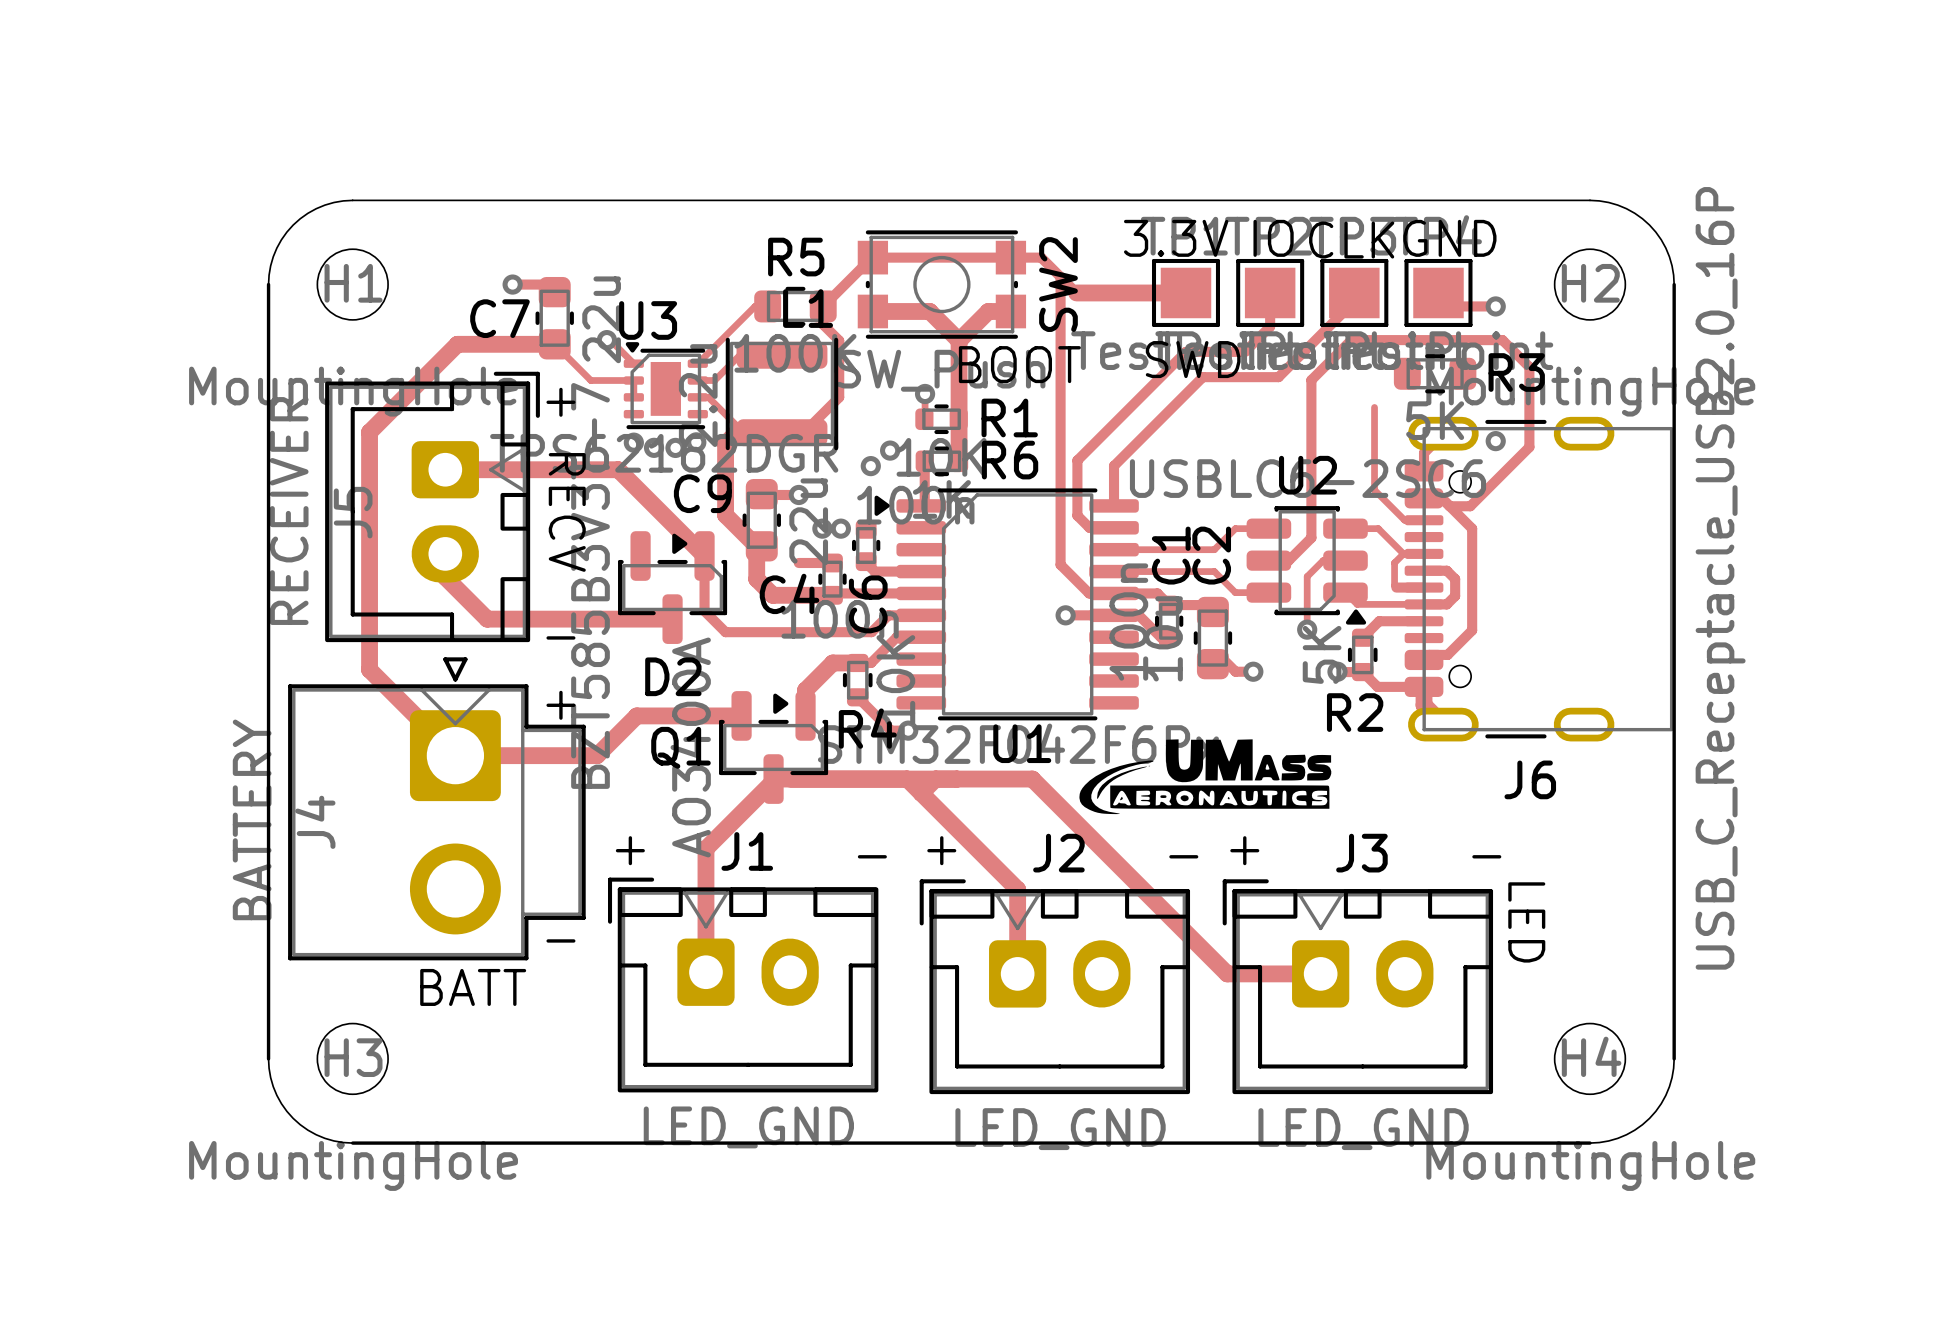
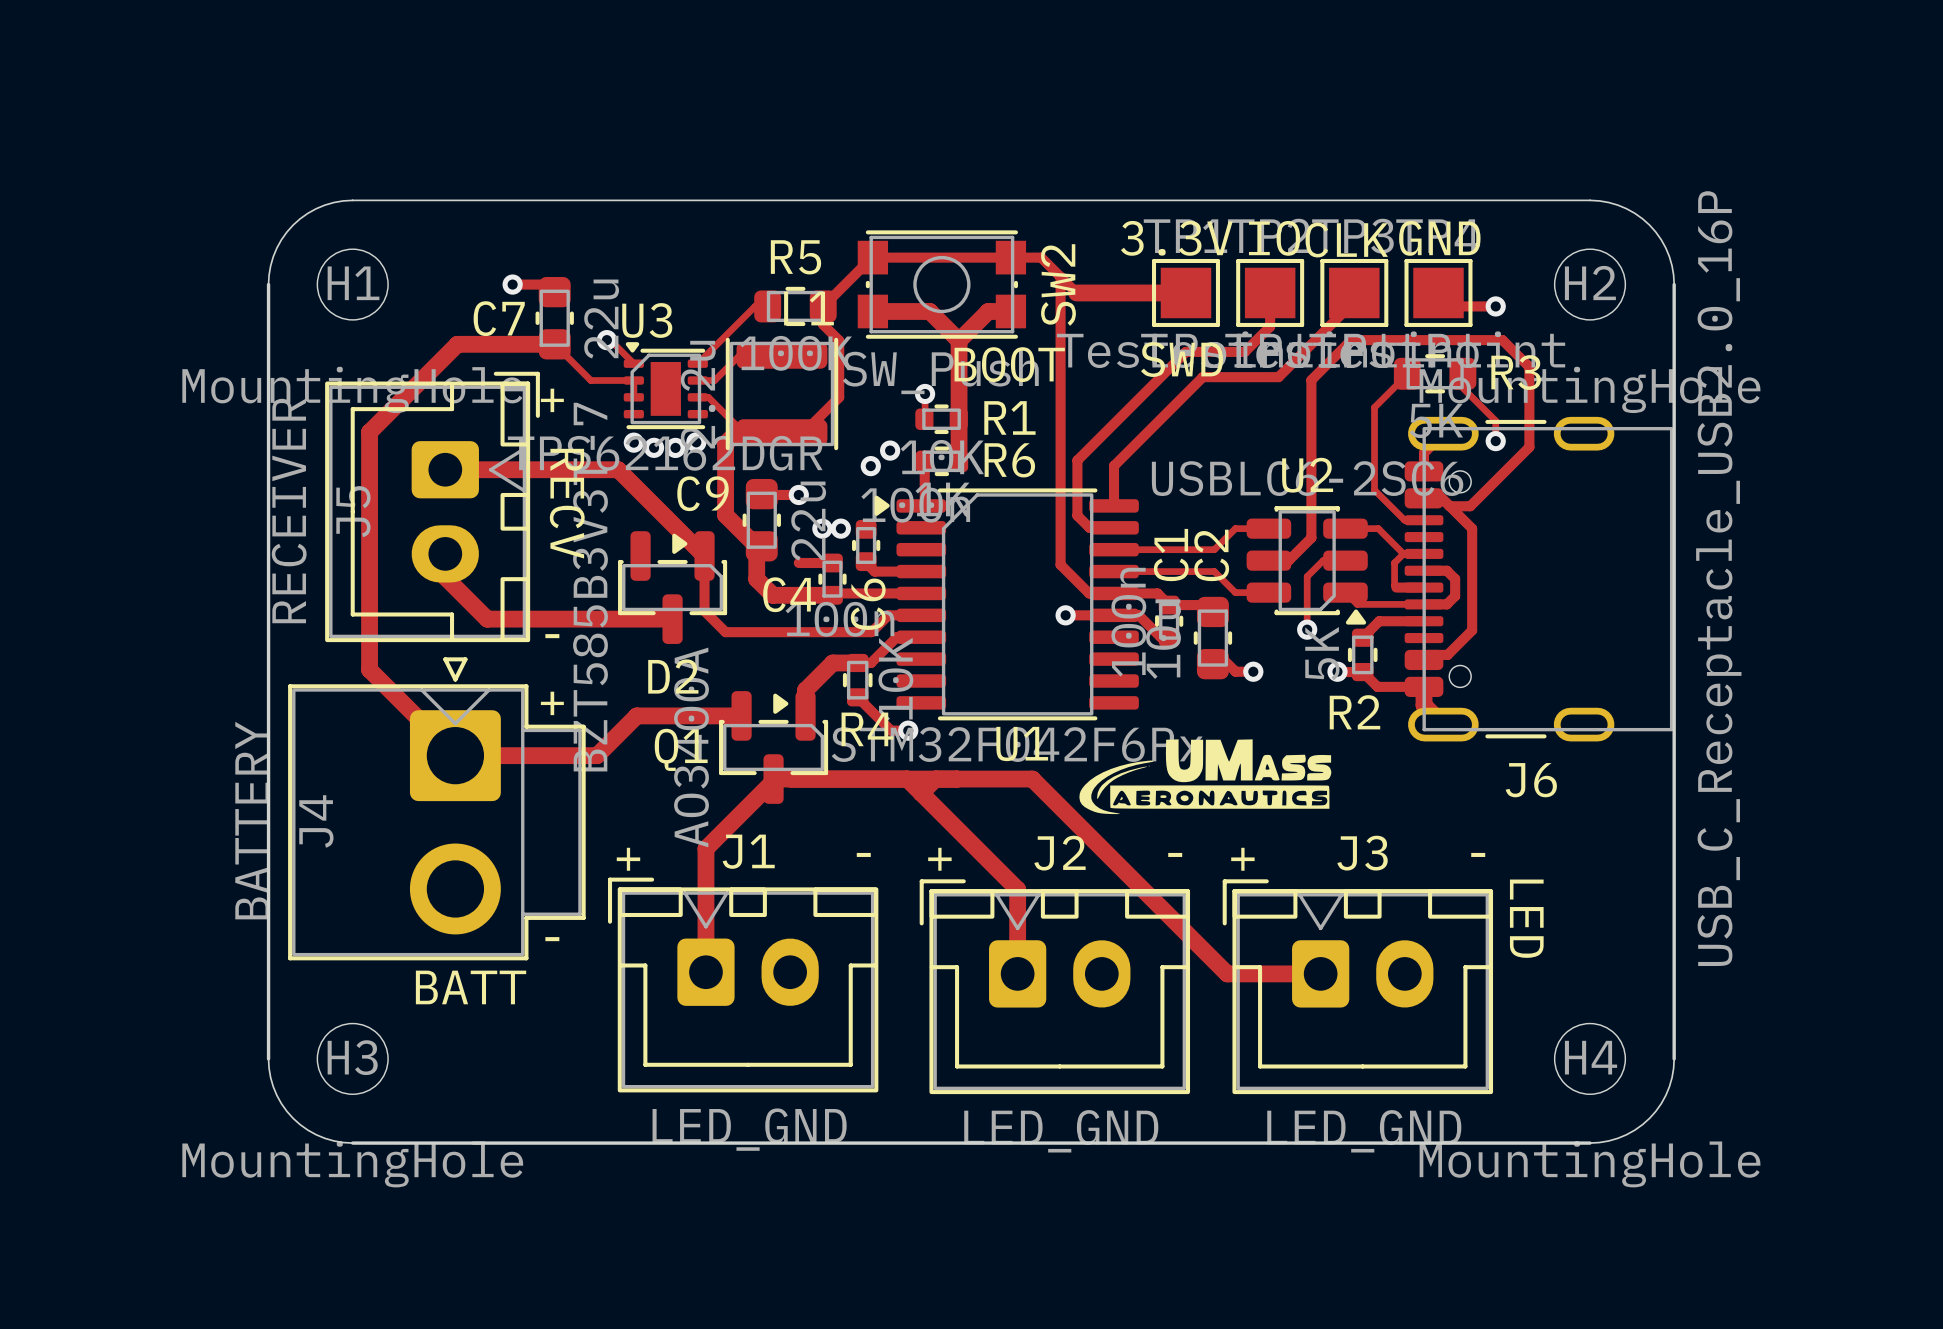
top track: none -> (1407, 373) (1374, 407)
top track: none -> (1462, 388) (1495, 420) (1495, 441)

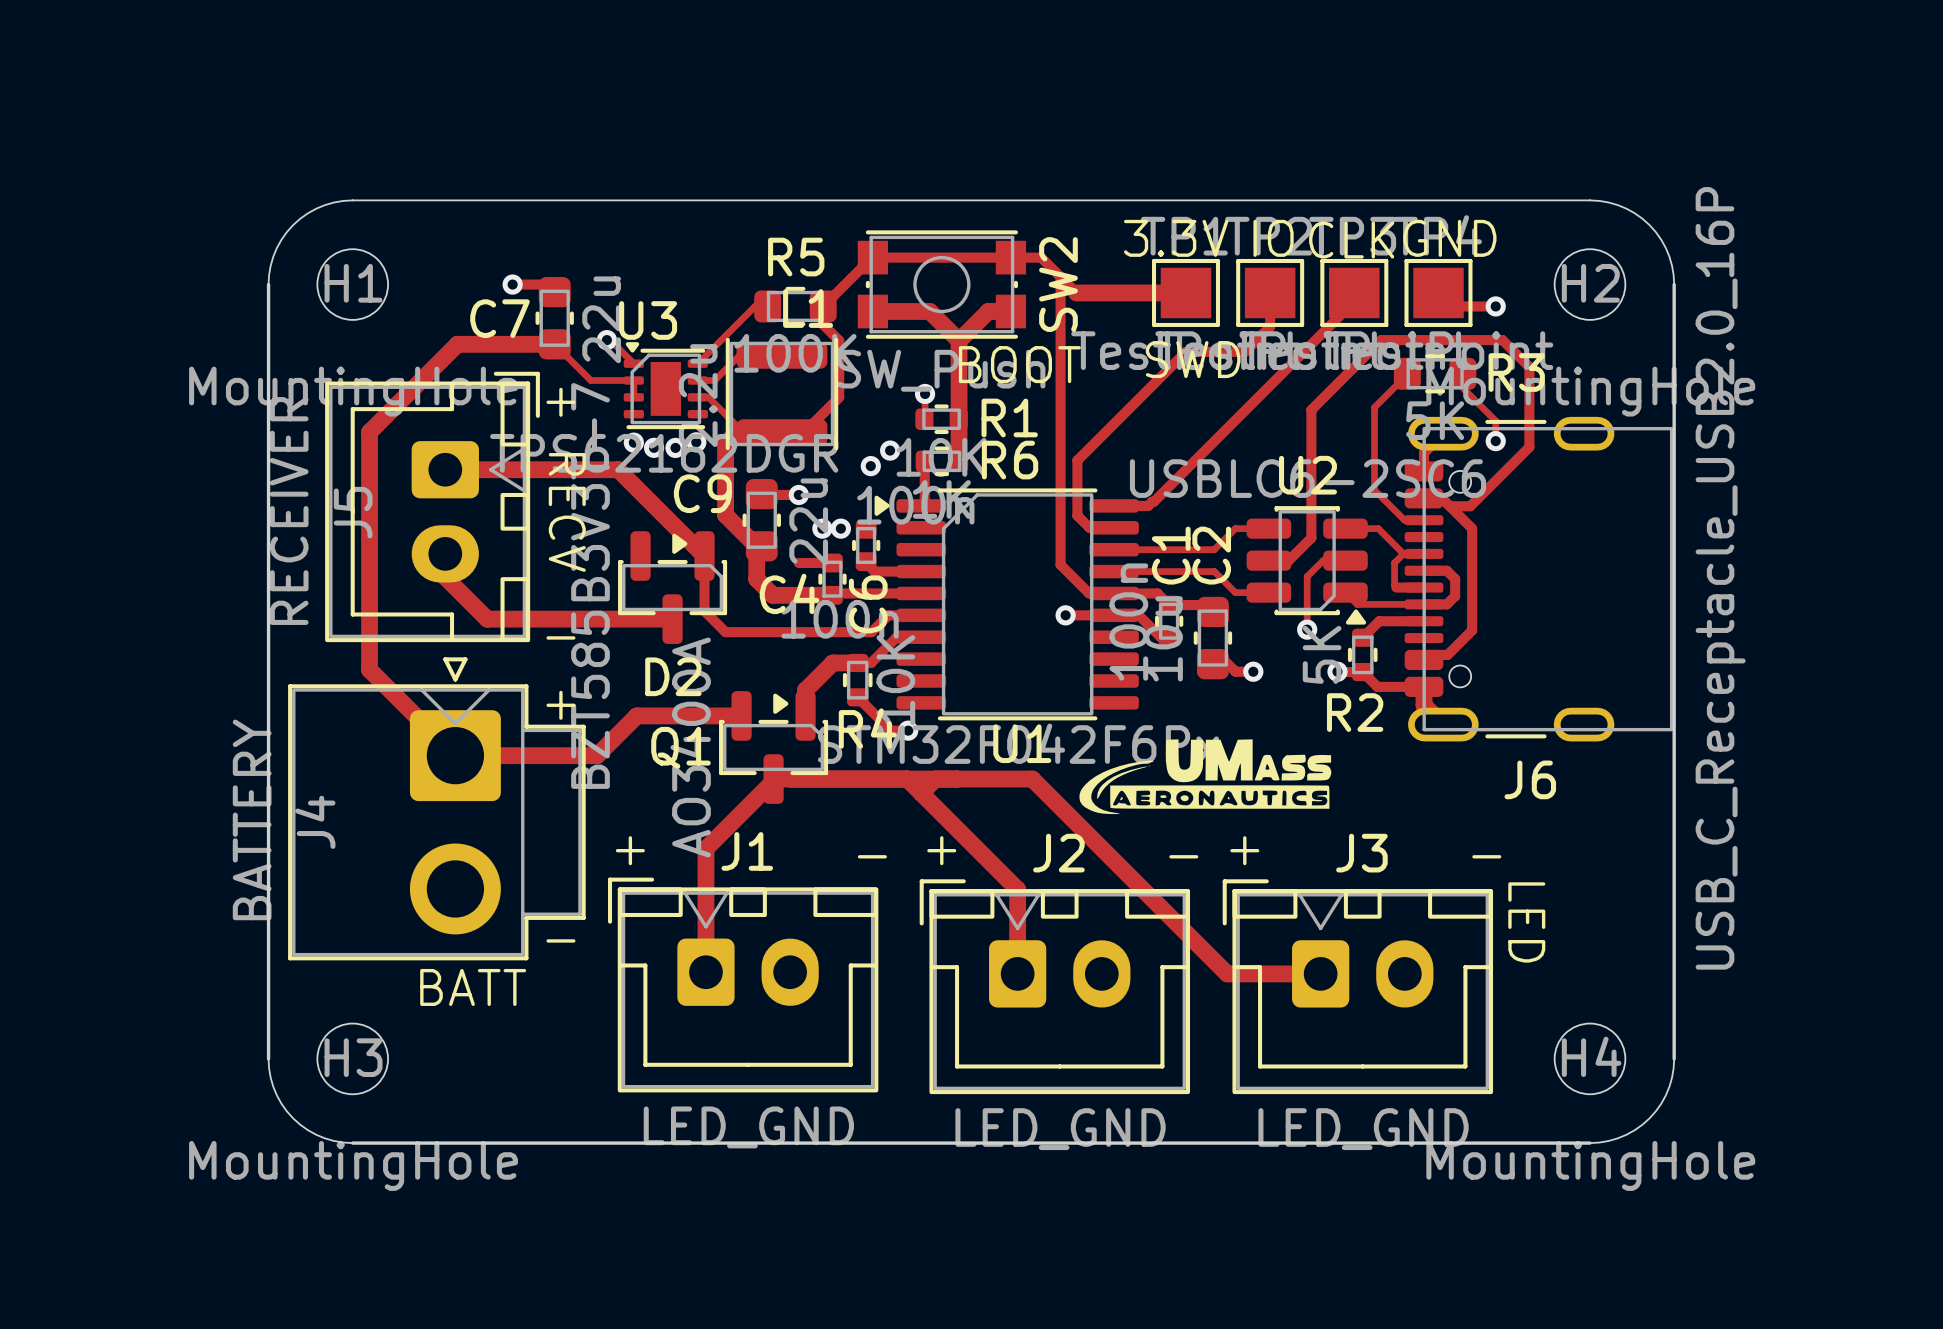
top track: (1381, 340) (1351, 340) (1311, 380) (1311, 409) -> (1381, 340) (1311, 409)
top track: (1278, 377) (1202, 377) (1114, 465) (1114, 505) -> (1278, 377) (1154, 501) (1148, 505) (1114, 505)

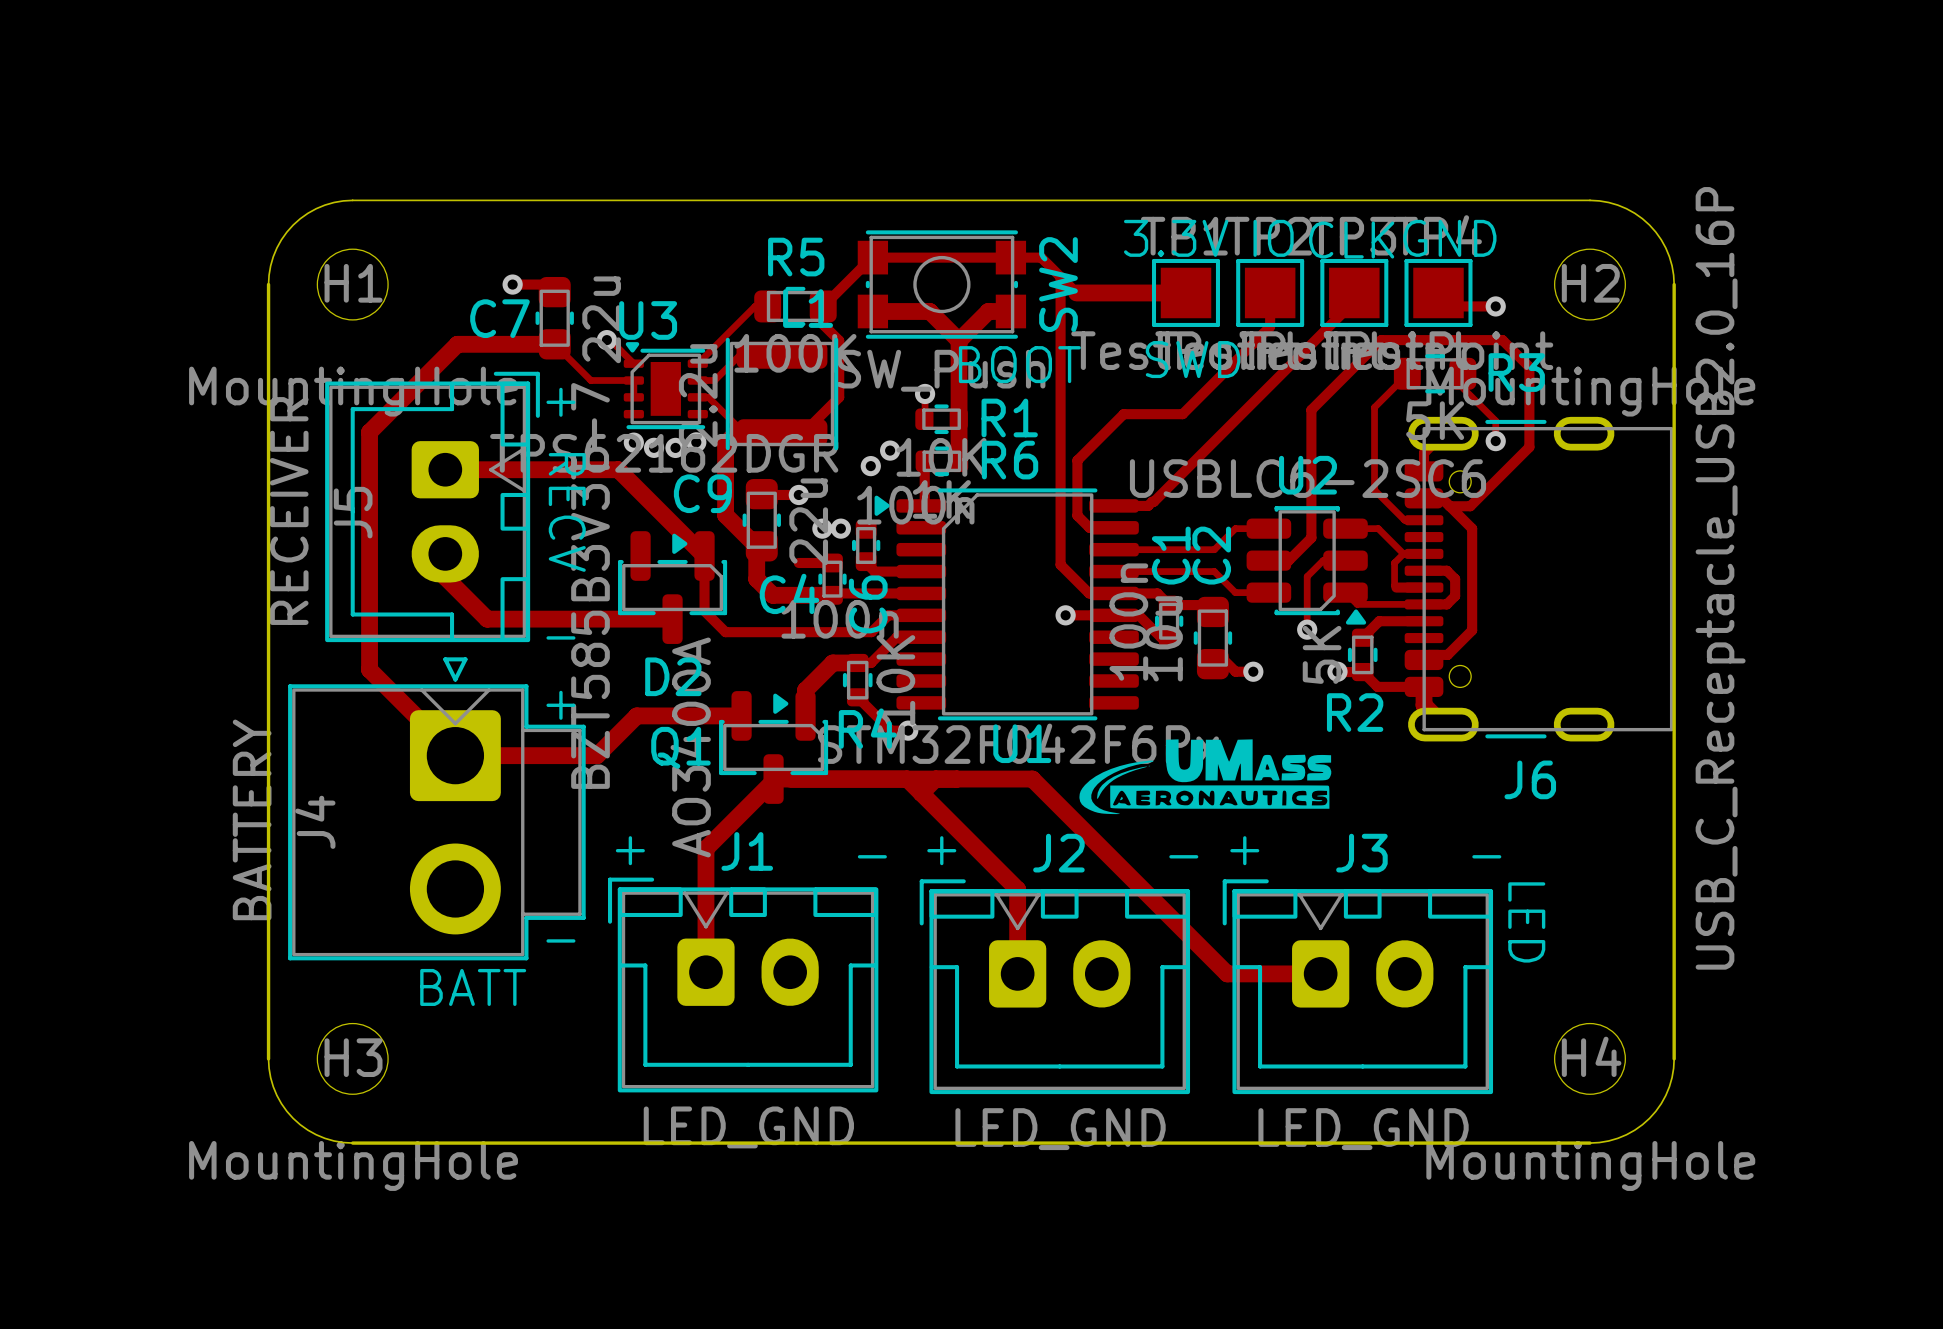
top track: (1244, 351) (1185, 351) (1123, 414) -> (1244, 351) (1182, 414) (1123, 414)

